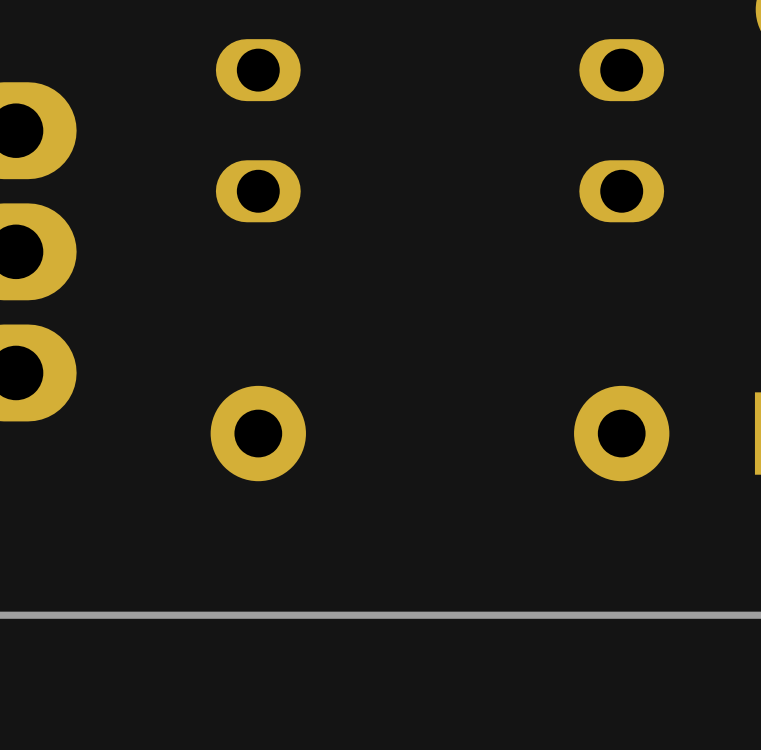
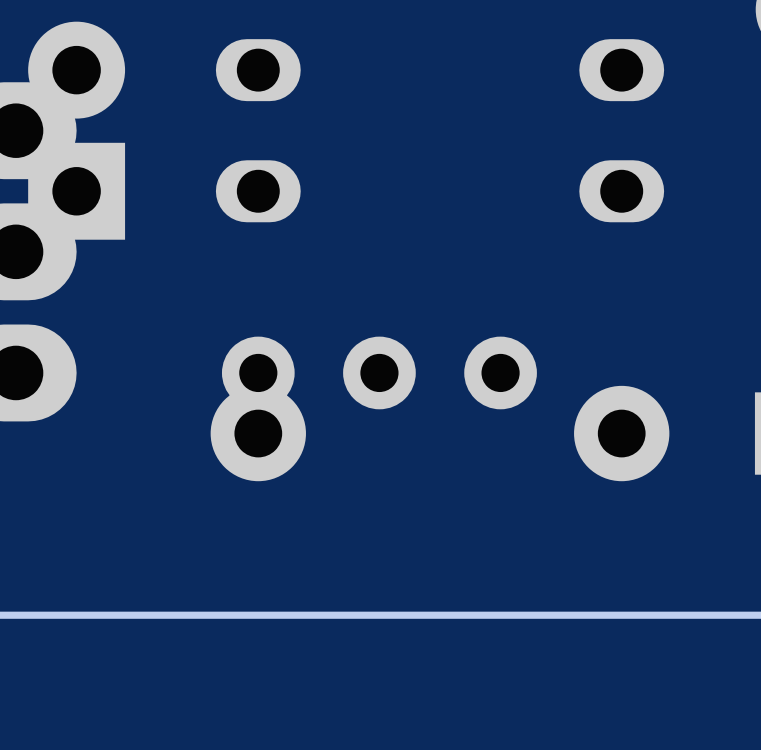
part: none -> (76, 130)
part: none -> (379, 372)

